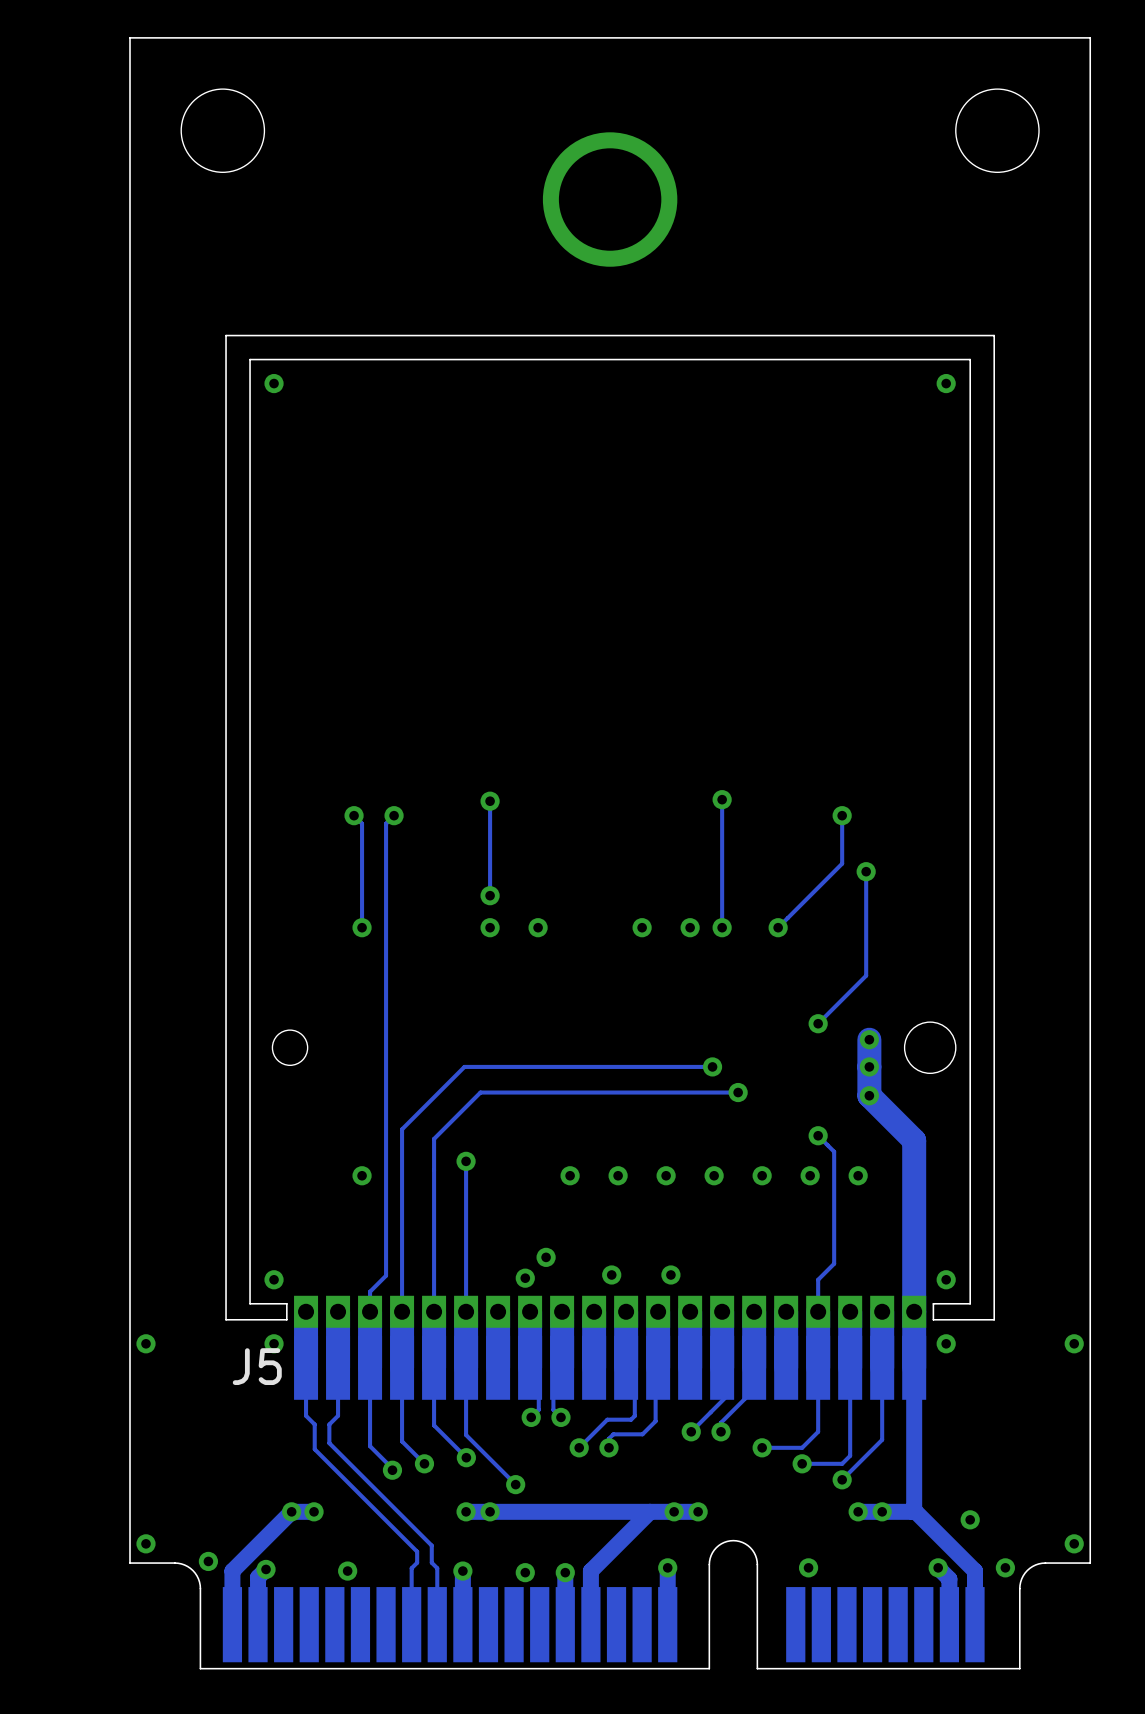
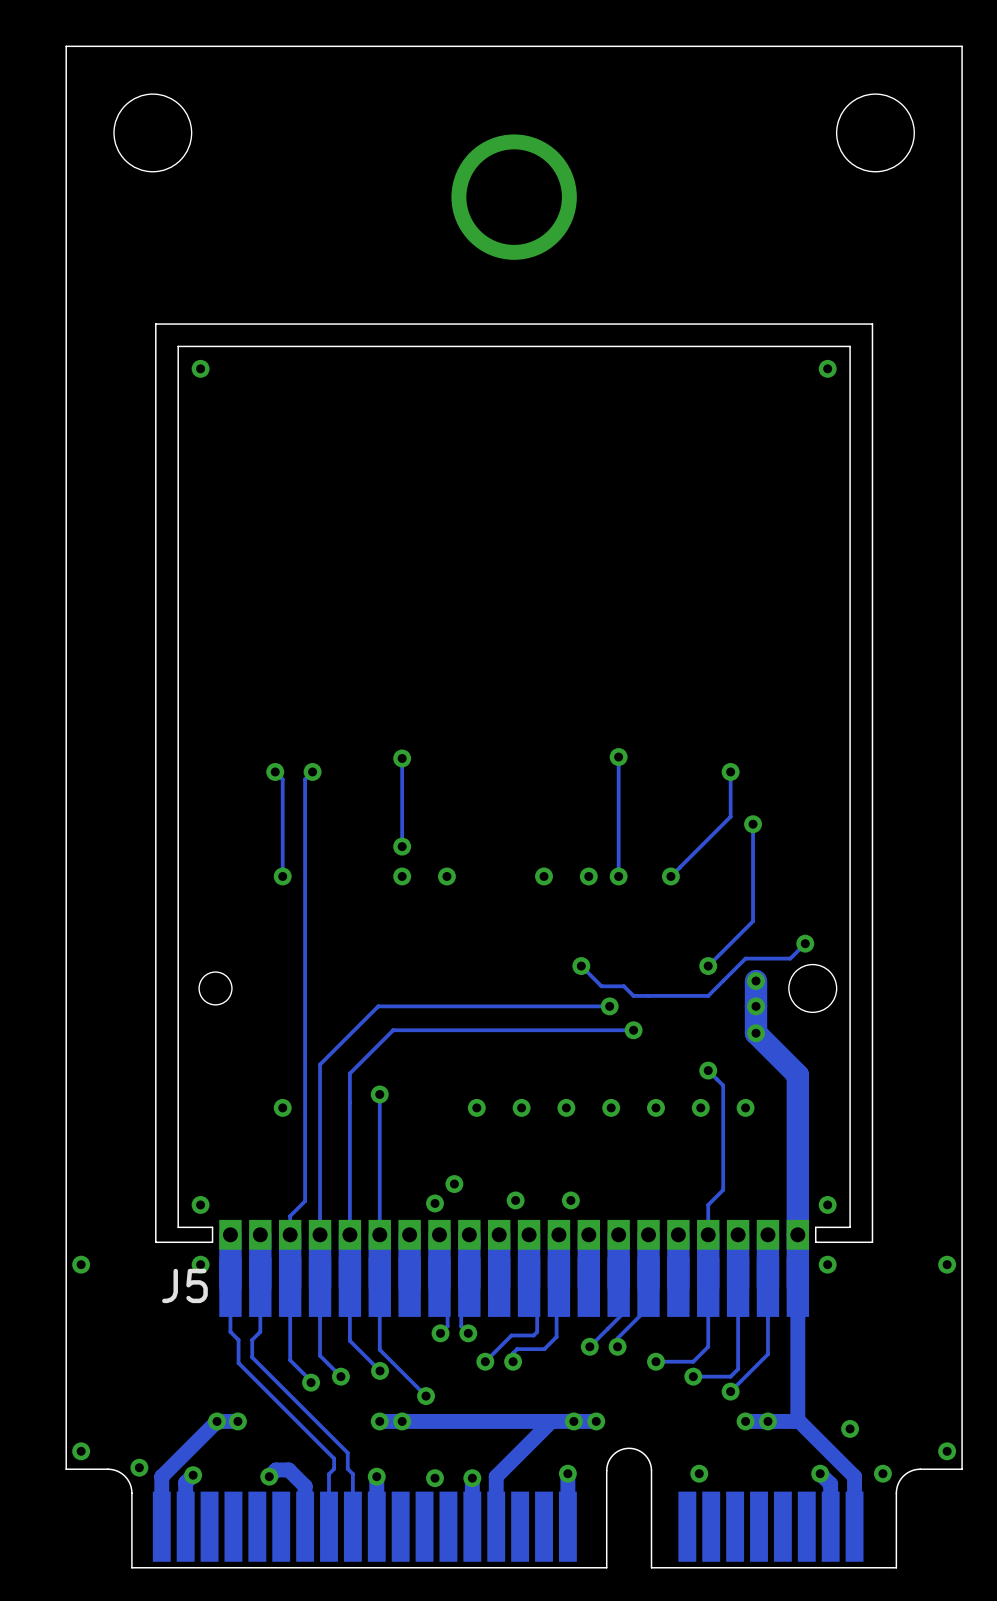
track: none -> (805, 943) (790, 958) (745, 958) (708, 995) (633, 995) (623, 986) (601, 986) (581, 966)
via: none -> (805, 943)
via: none -> (581, 966)
track: none -> (269, 1476) (275, 1469) (288, 1469) (305, 1486) (305, 1526)

